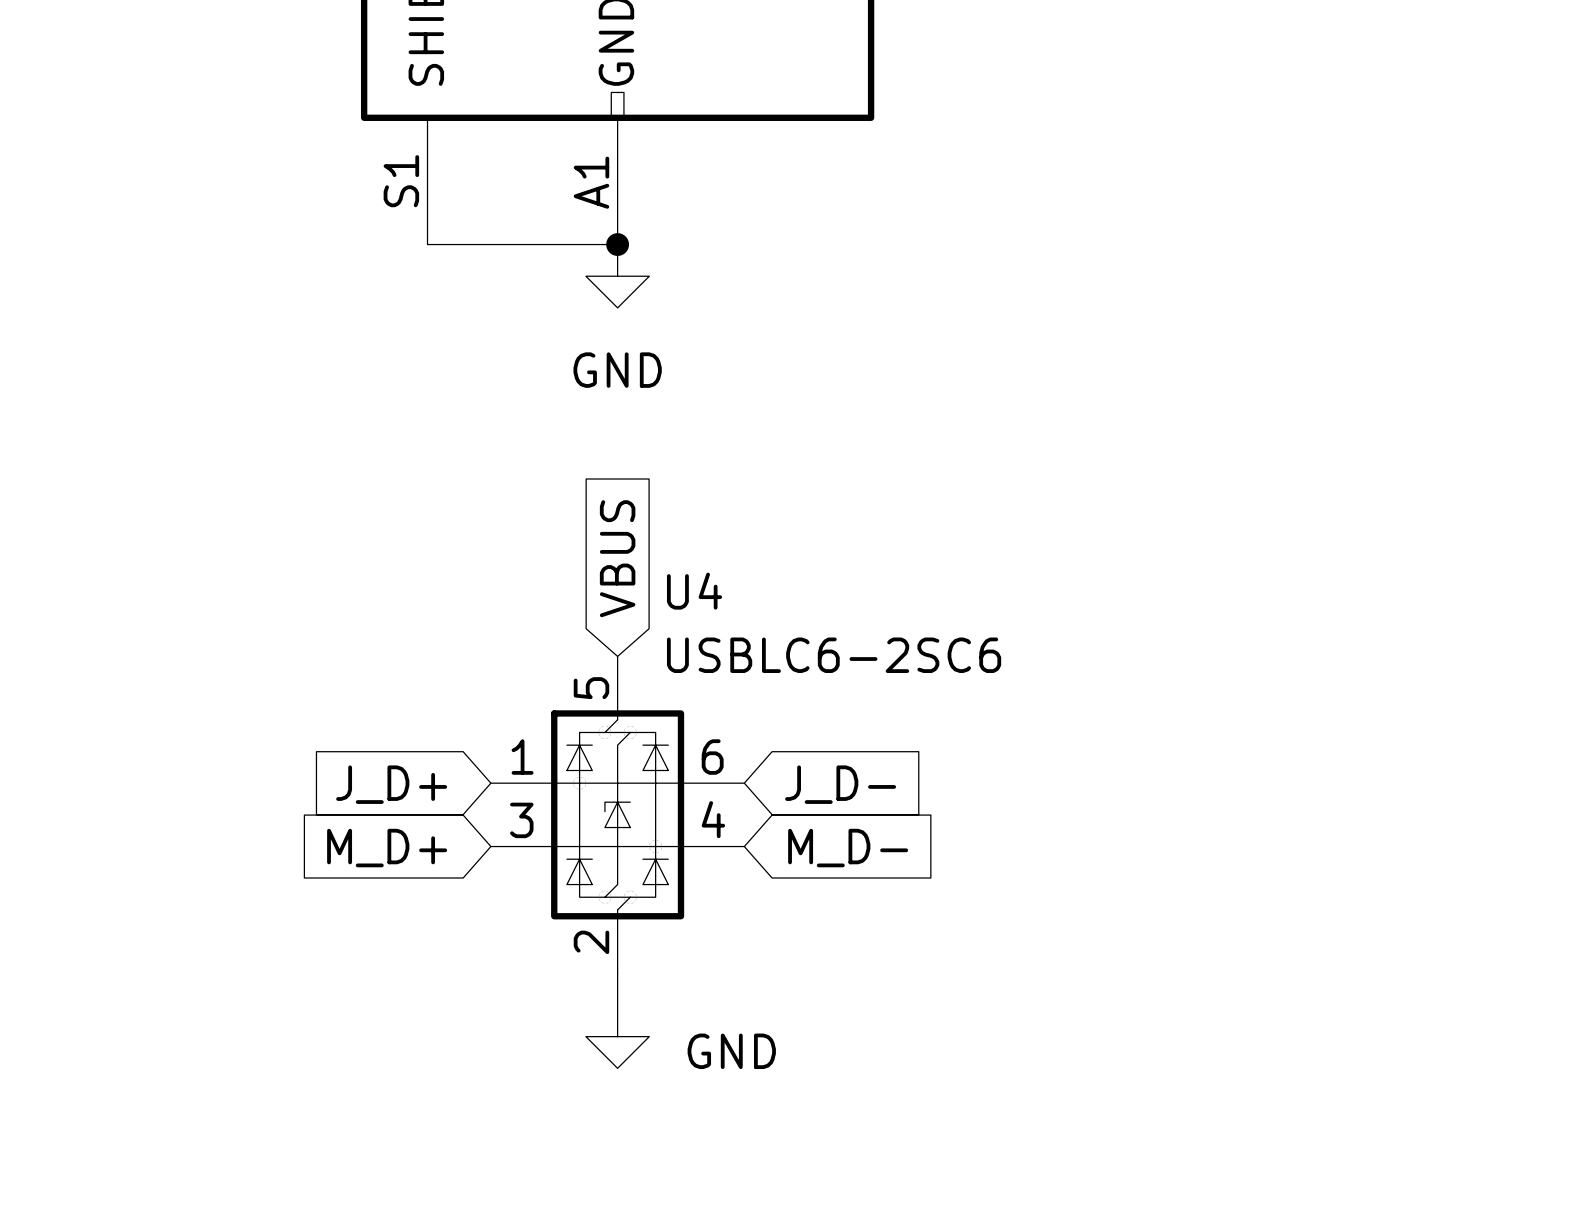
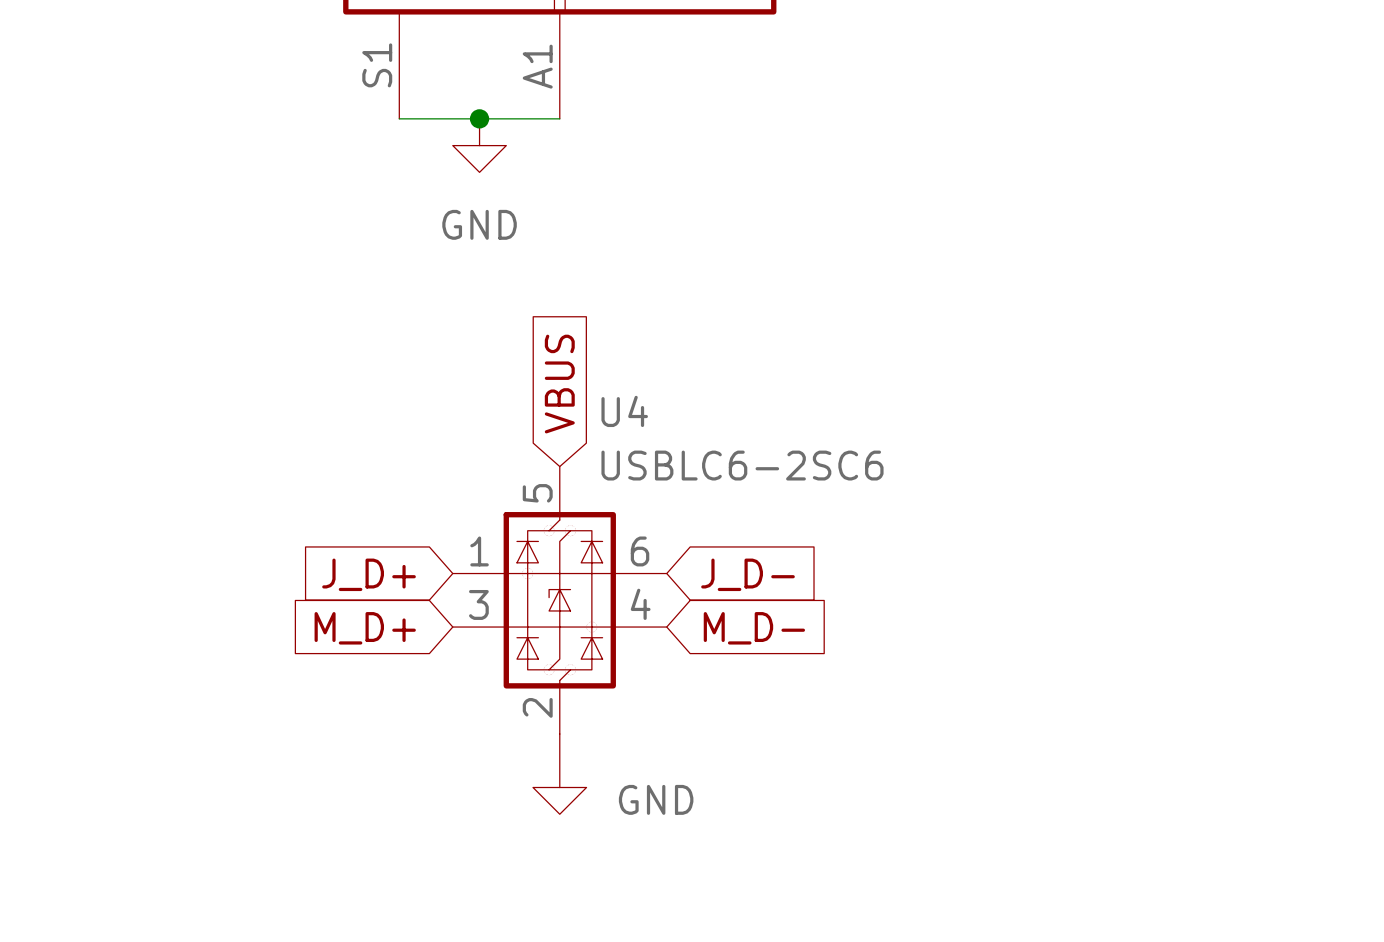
junction position: (617, 244) -> (479, 118)
power symbol position: GND (617, 276) -> GND (479, 145)

